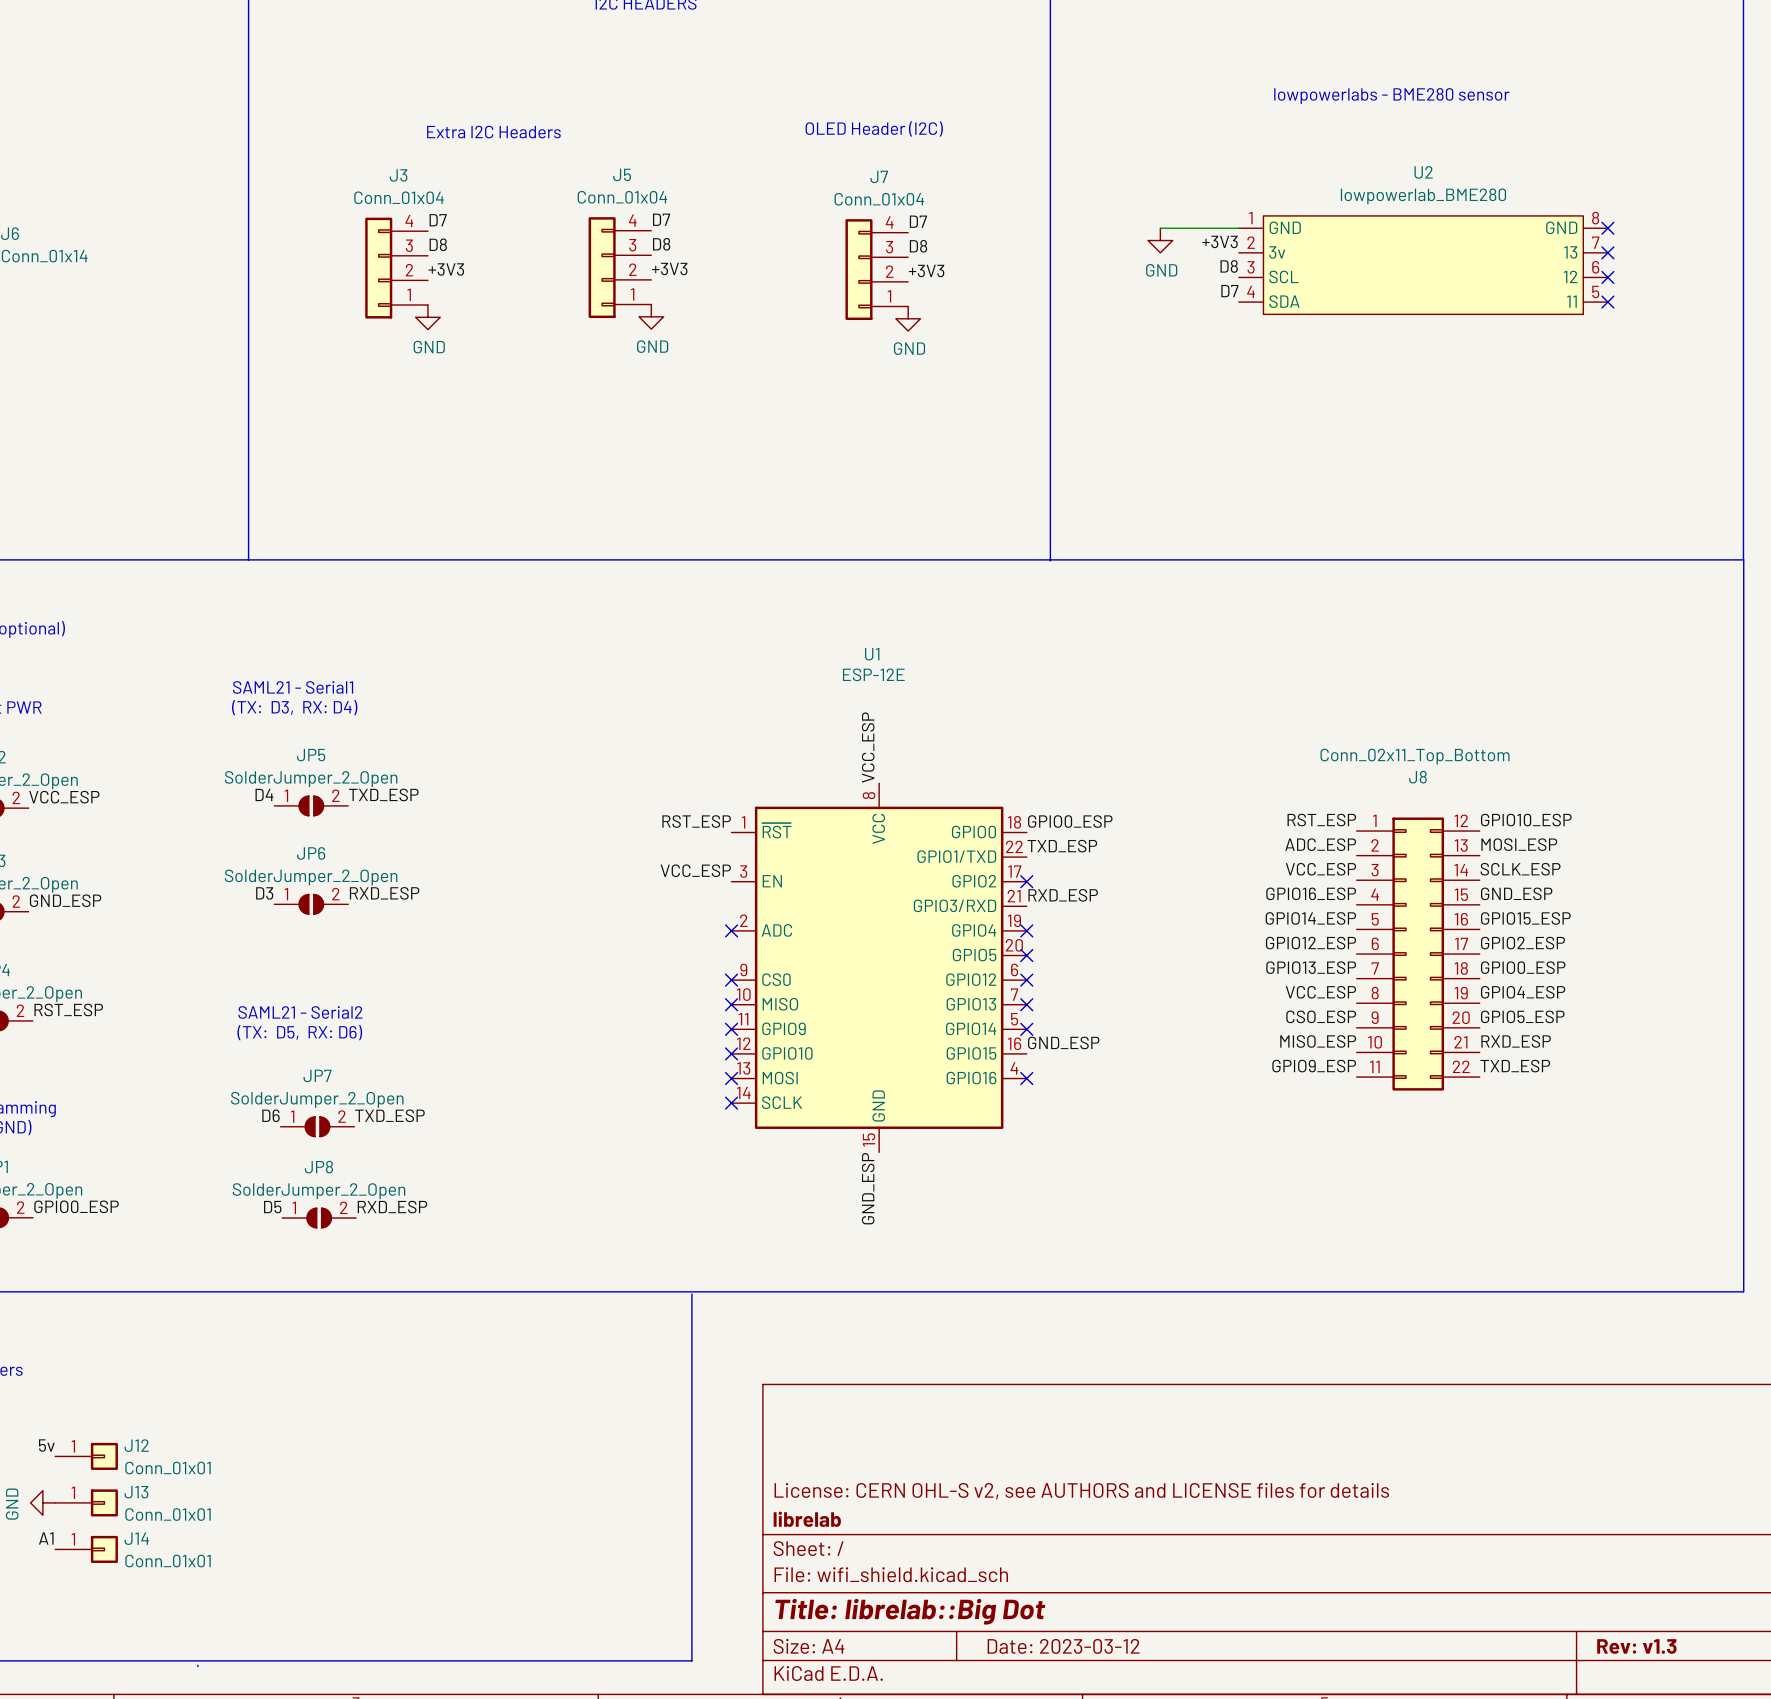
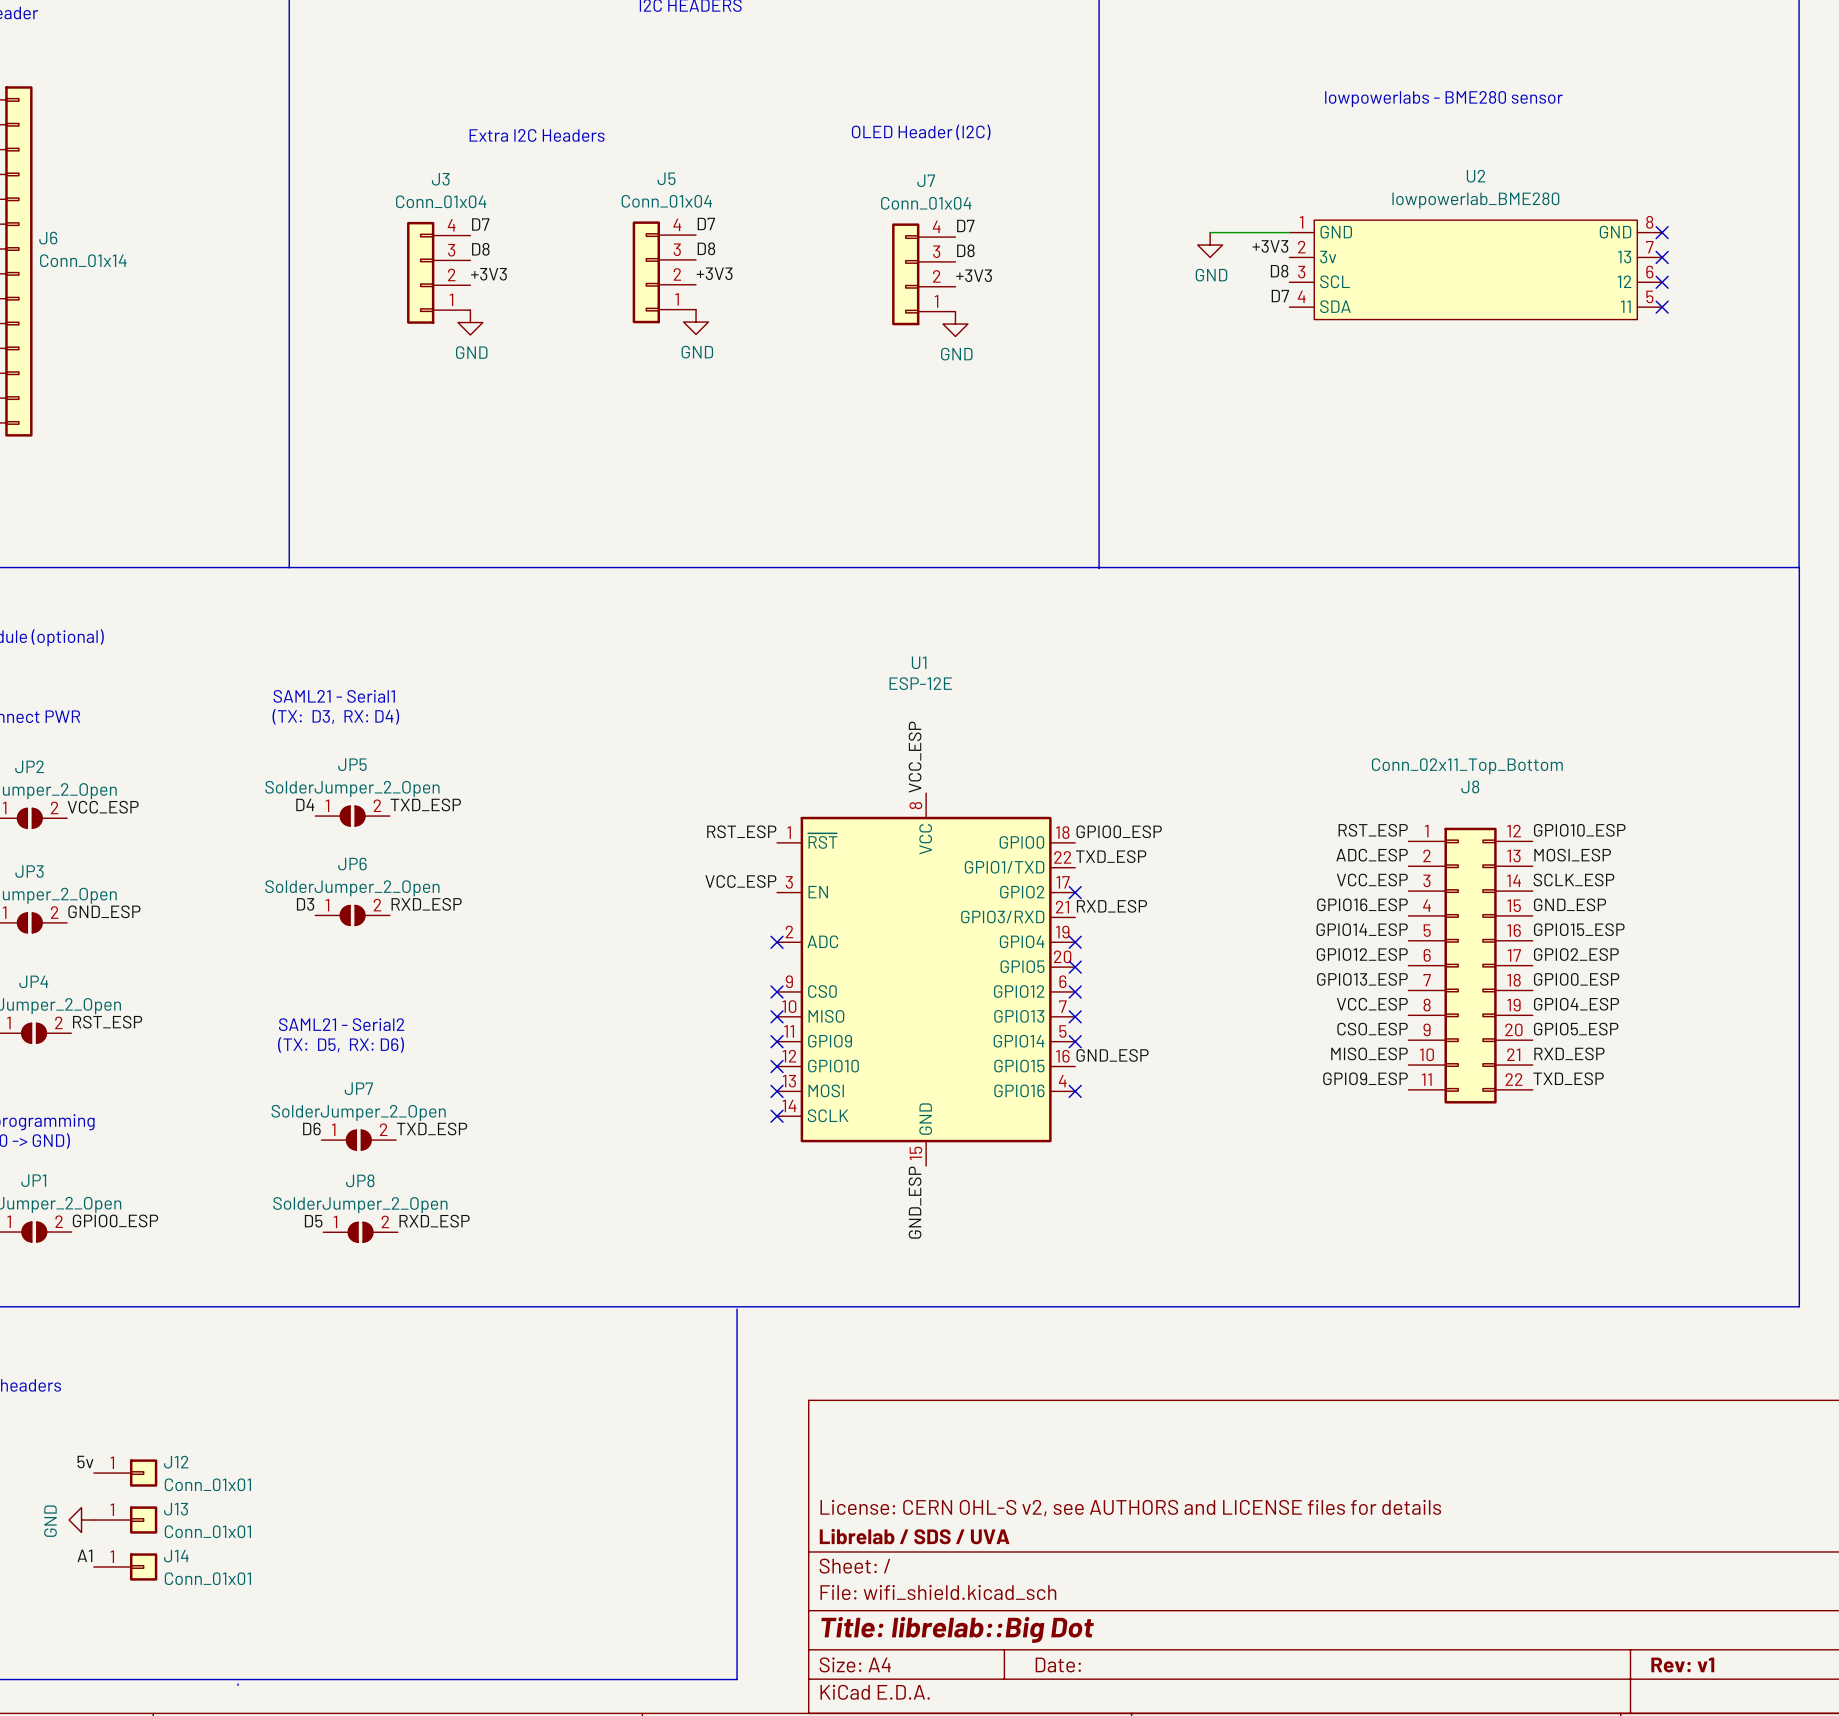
title block: librelab (807, 1519) -> Librelab / SDS / UVA (914, 1536)
title block: Date: 2023-03-12 (1063, 1646) -> Date: (1058, 1665)
title block: Rev: v1.3 (1636, 1646) -> Rev: v1 (1682, 1665)

